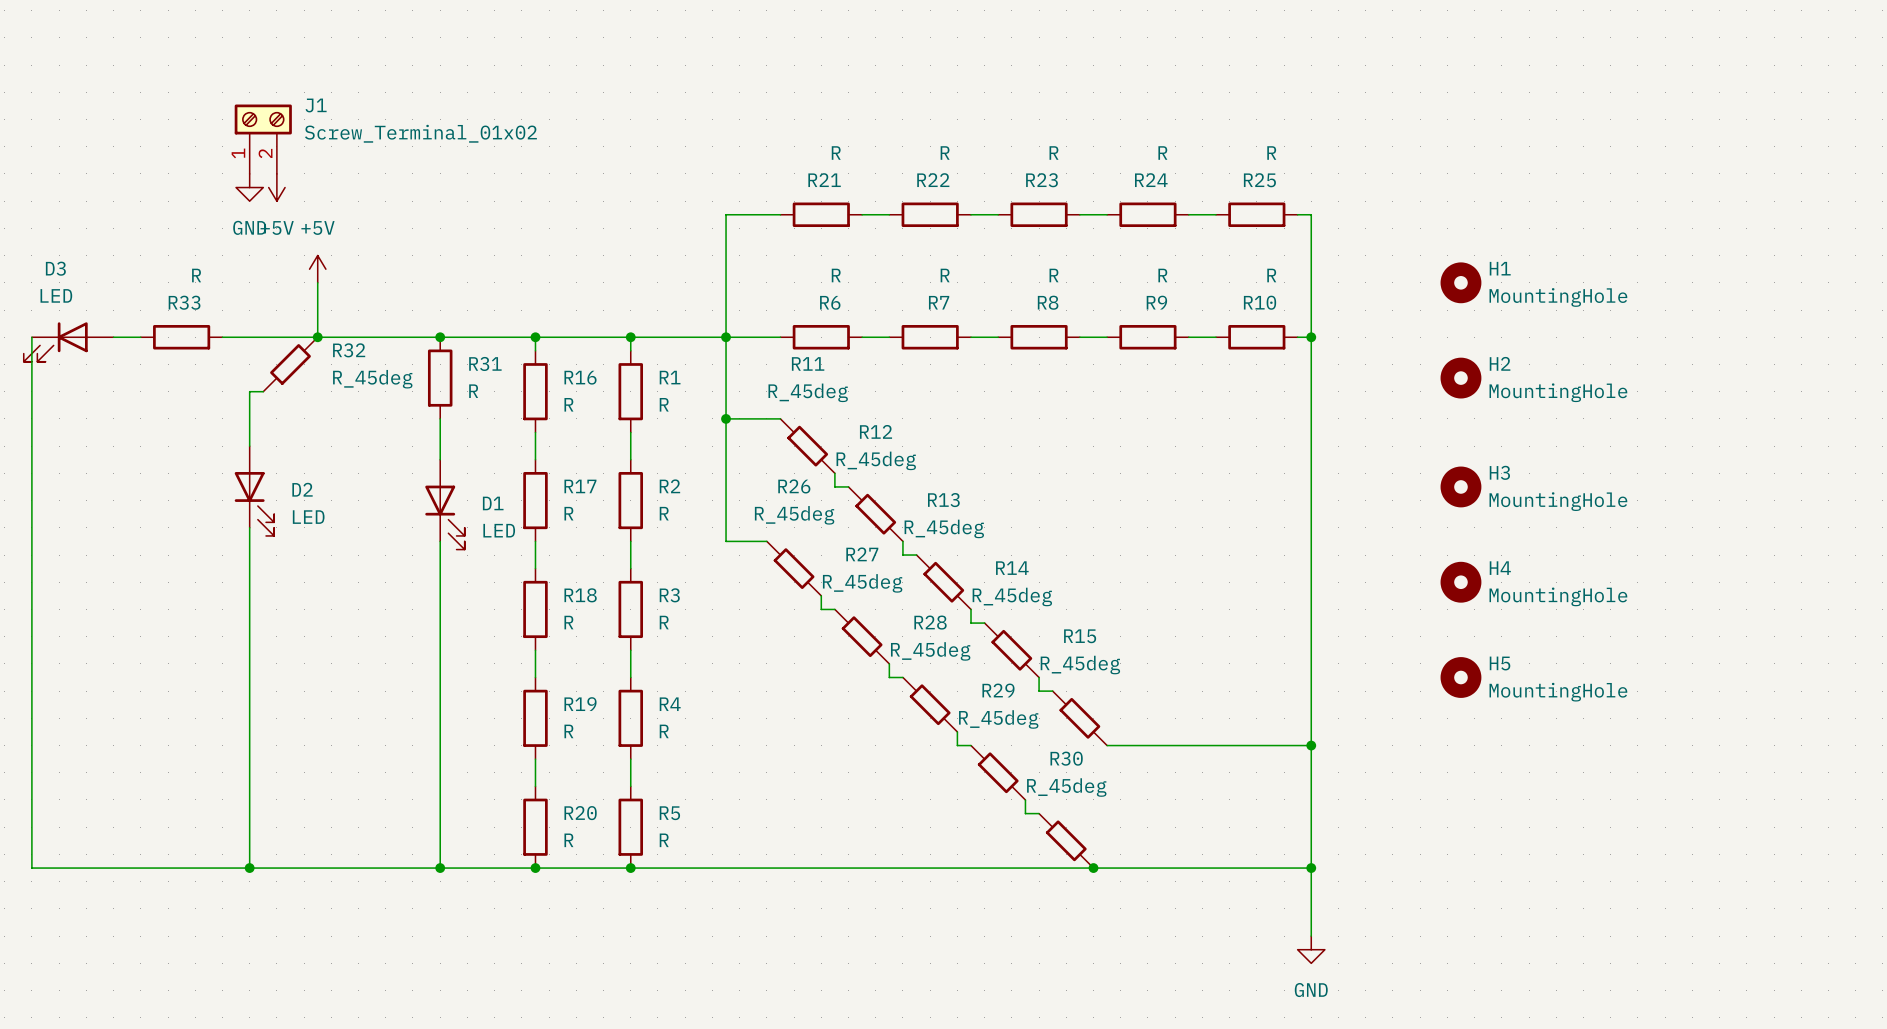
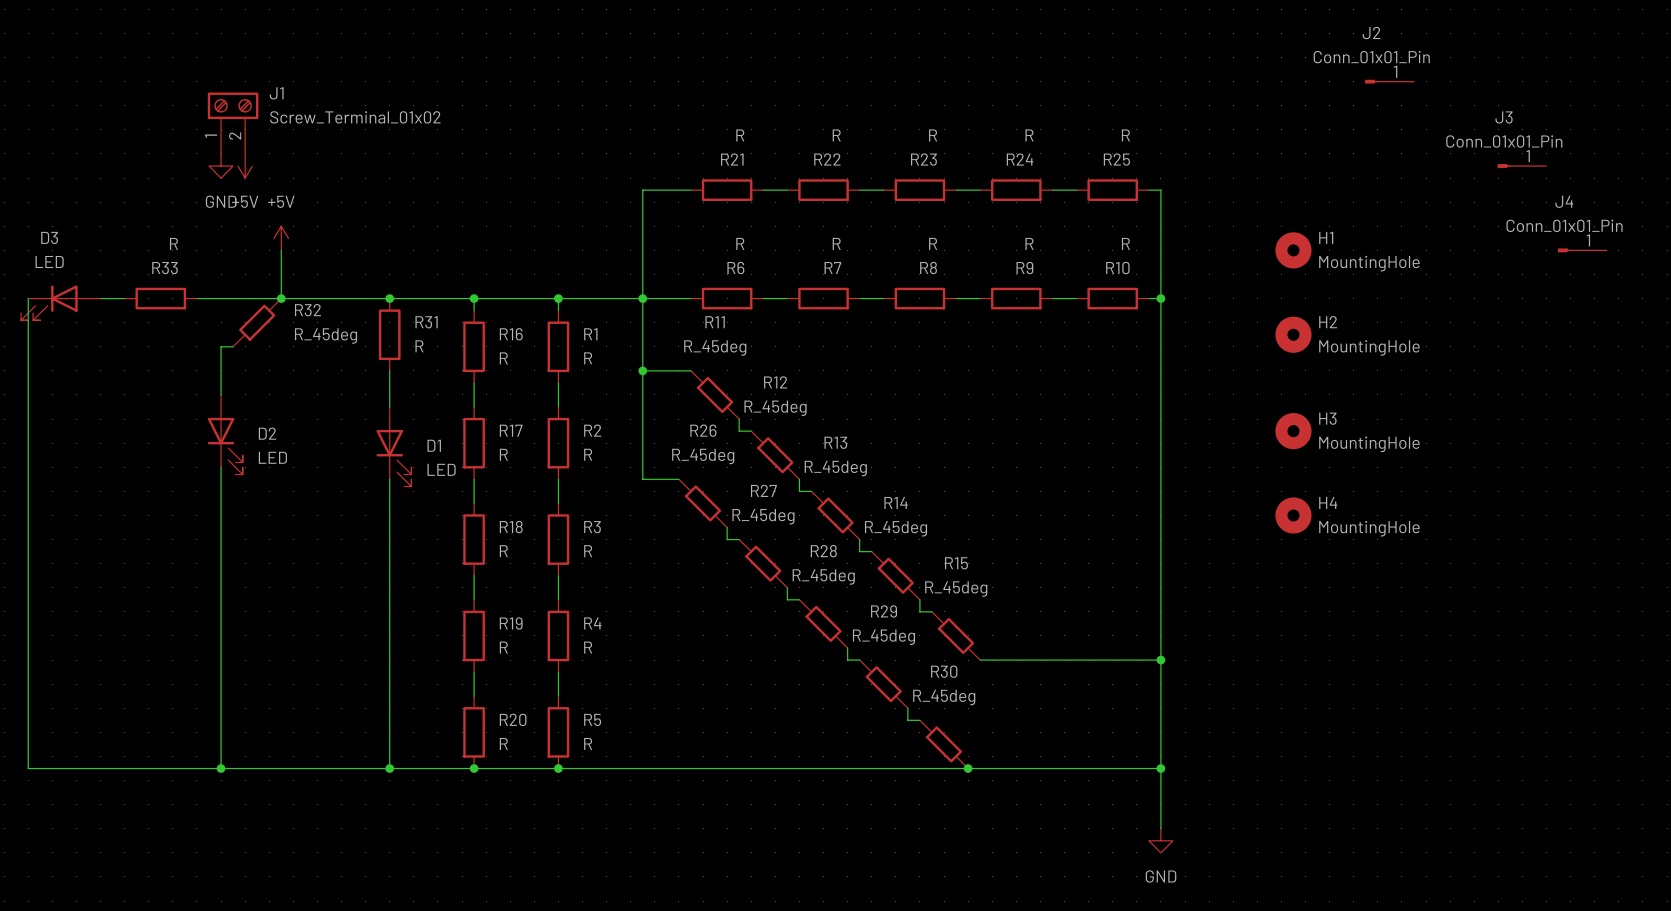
J2: none -> Conn_01x01_Pin (1389, 81)
J3: none -> Conn_01x01_Pin (1522, 166)
J4: none -> Conn_01x01_Pin (1582, 250)
H5: MountingHole (1460, 677) -> none

